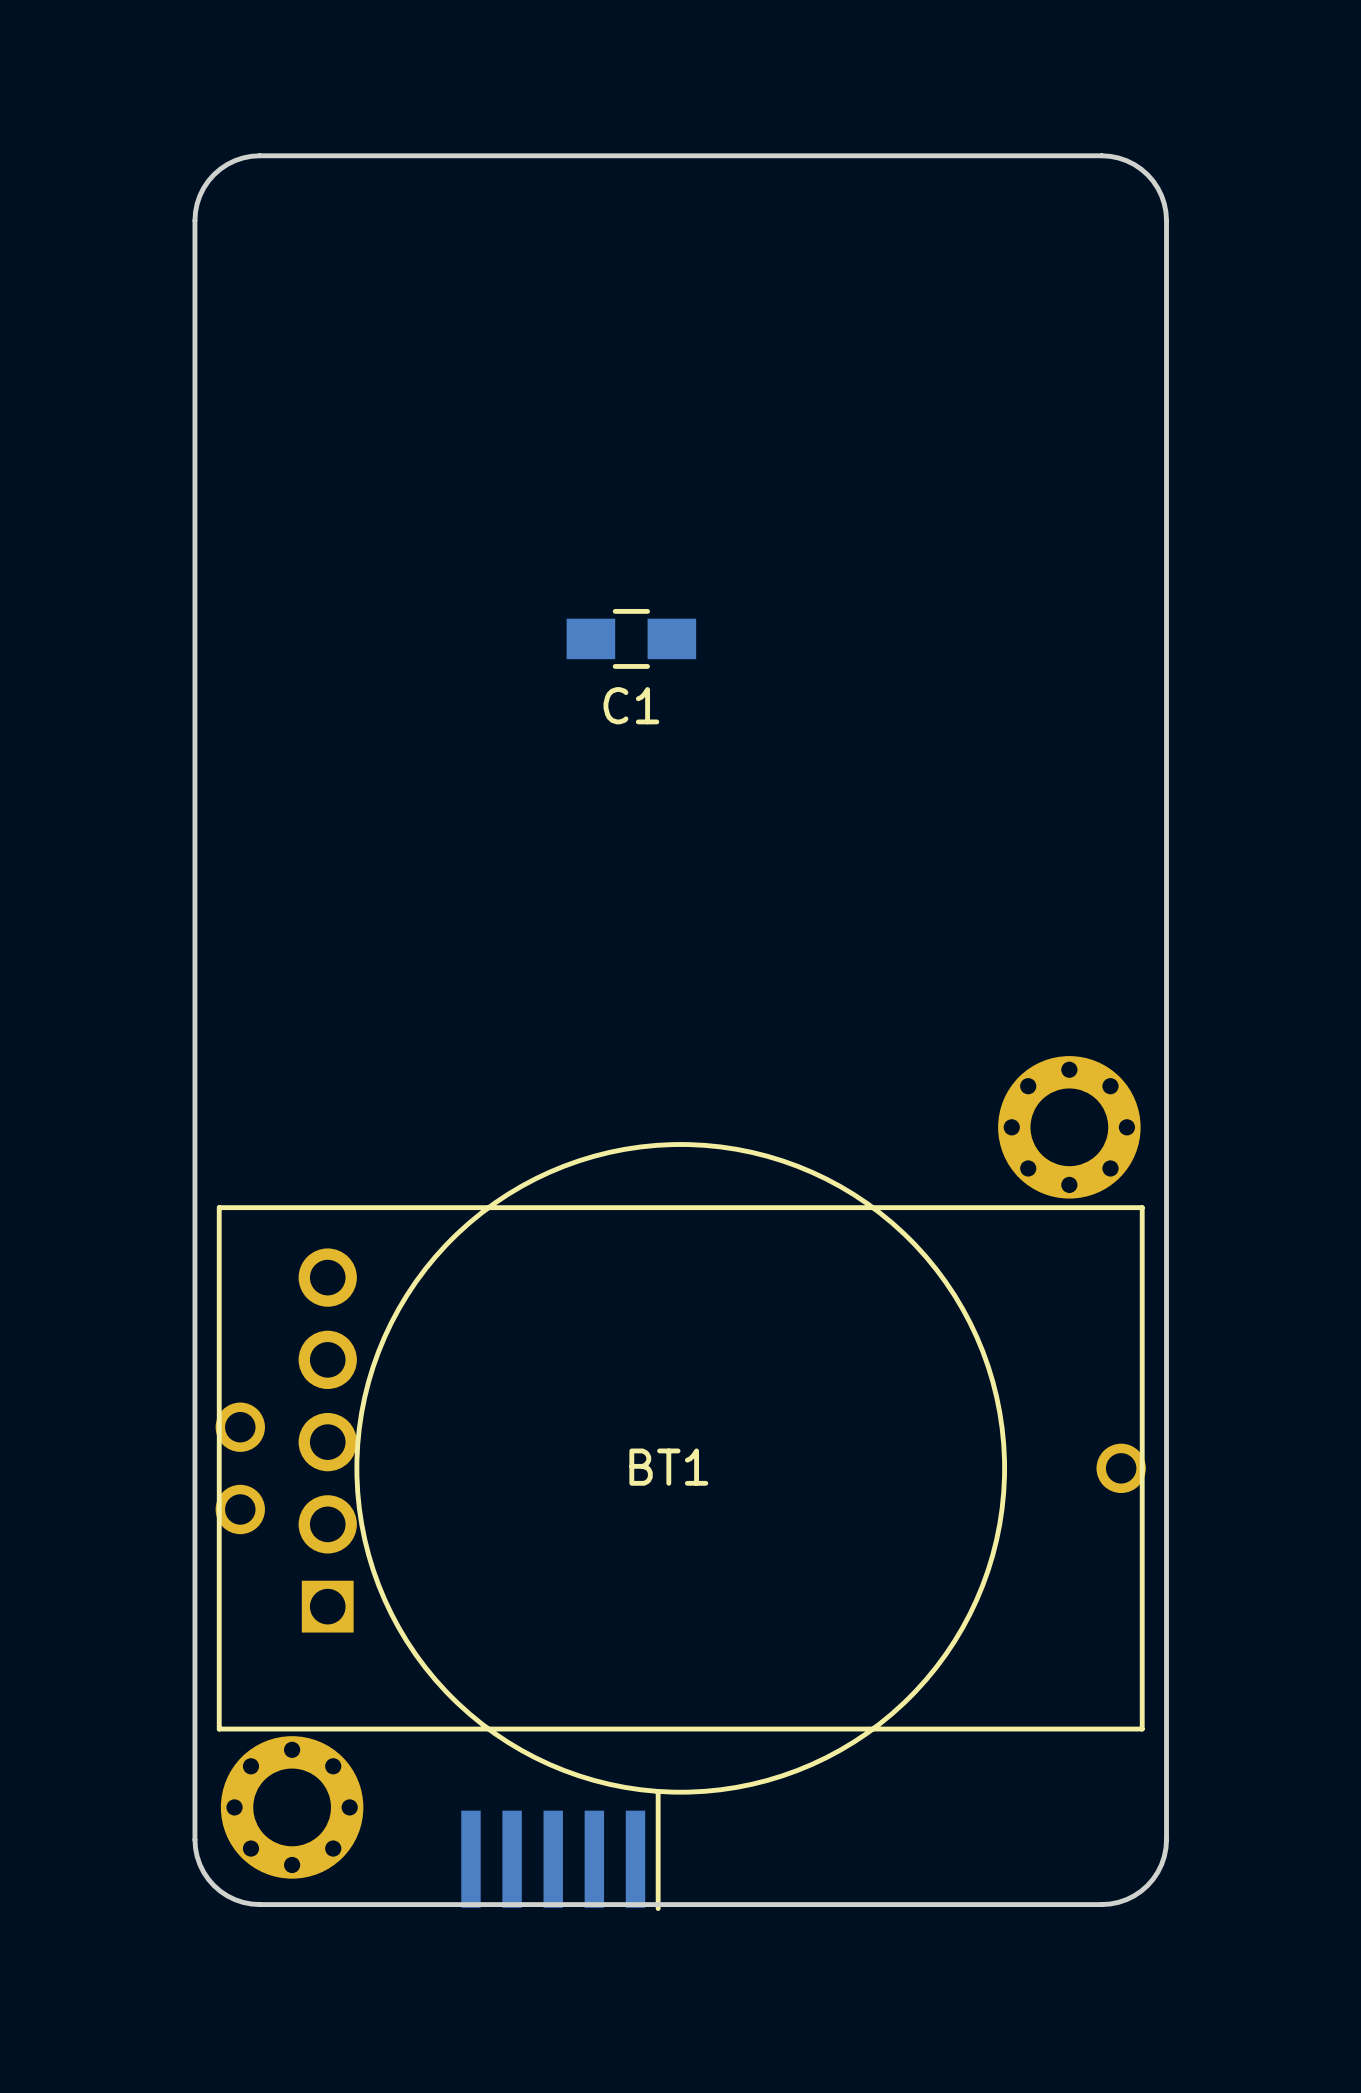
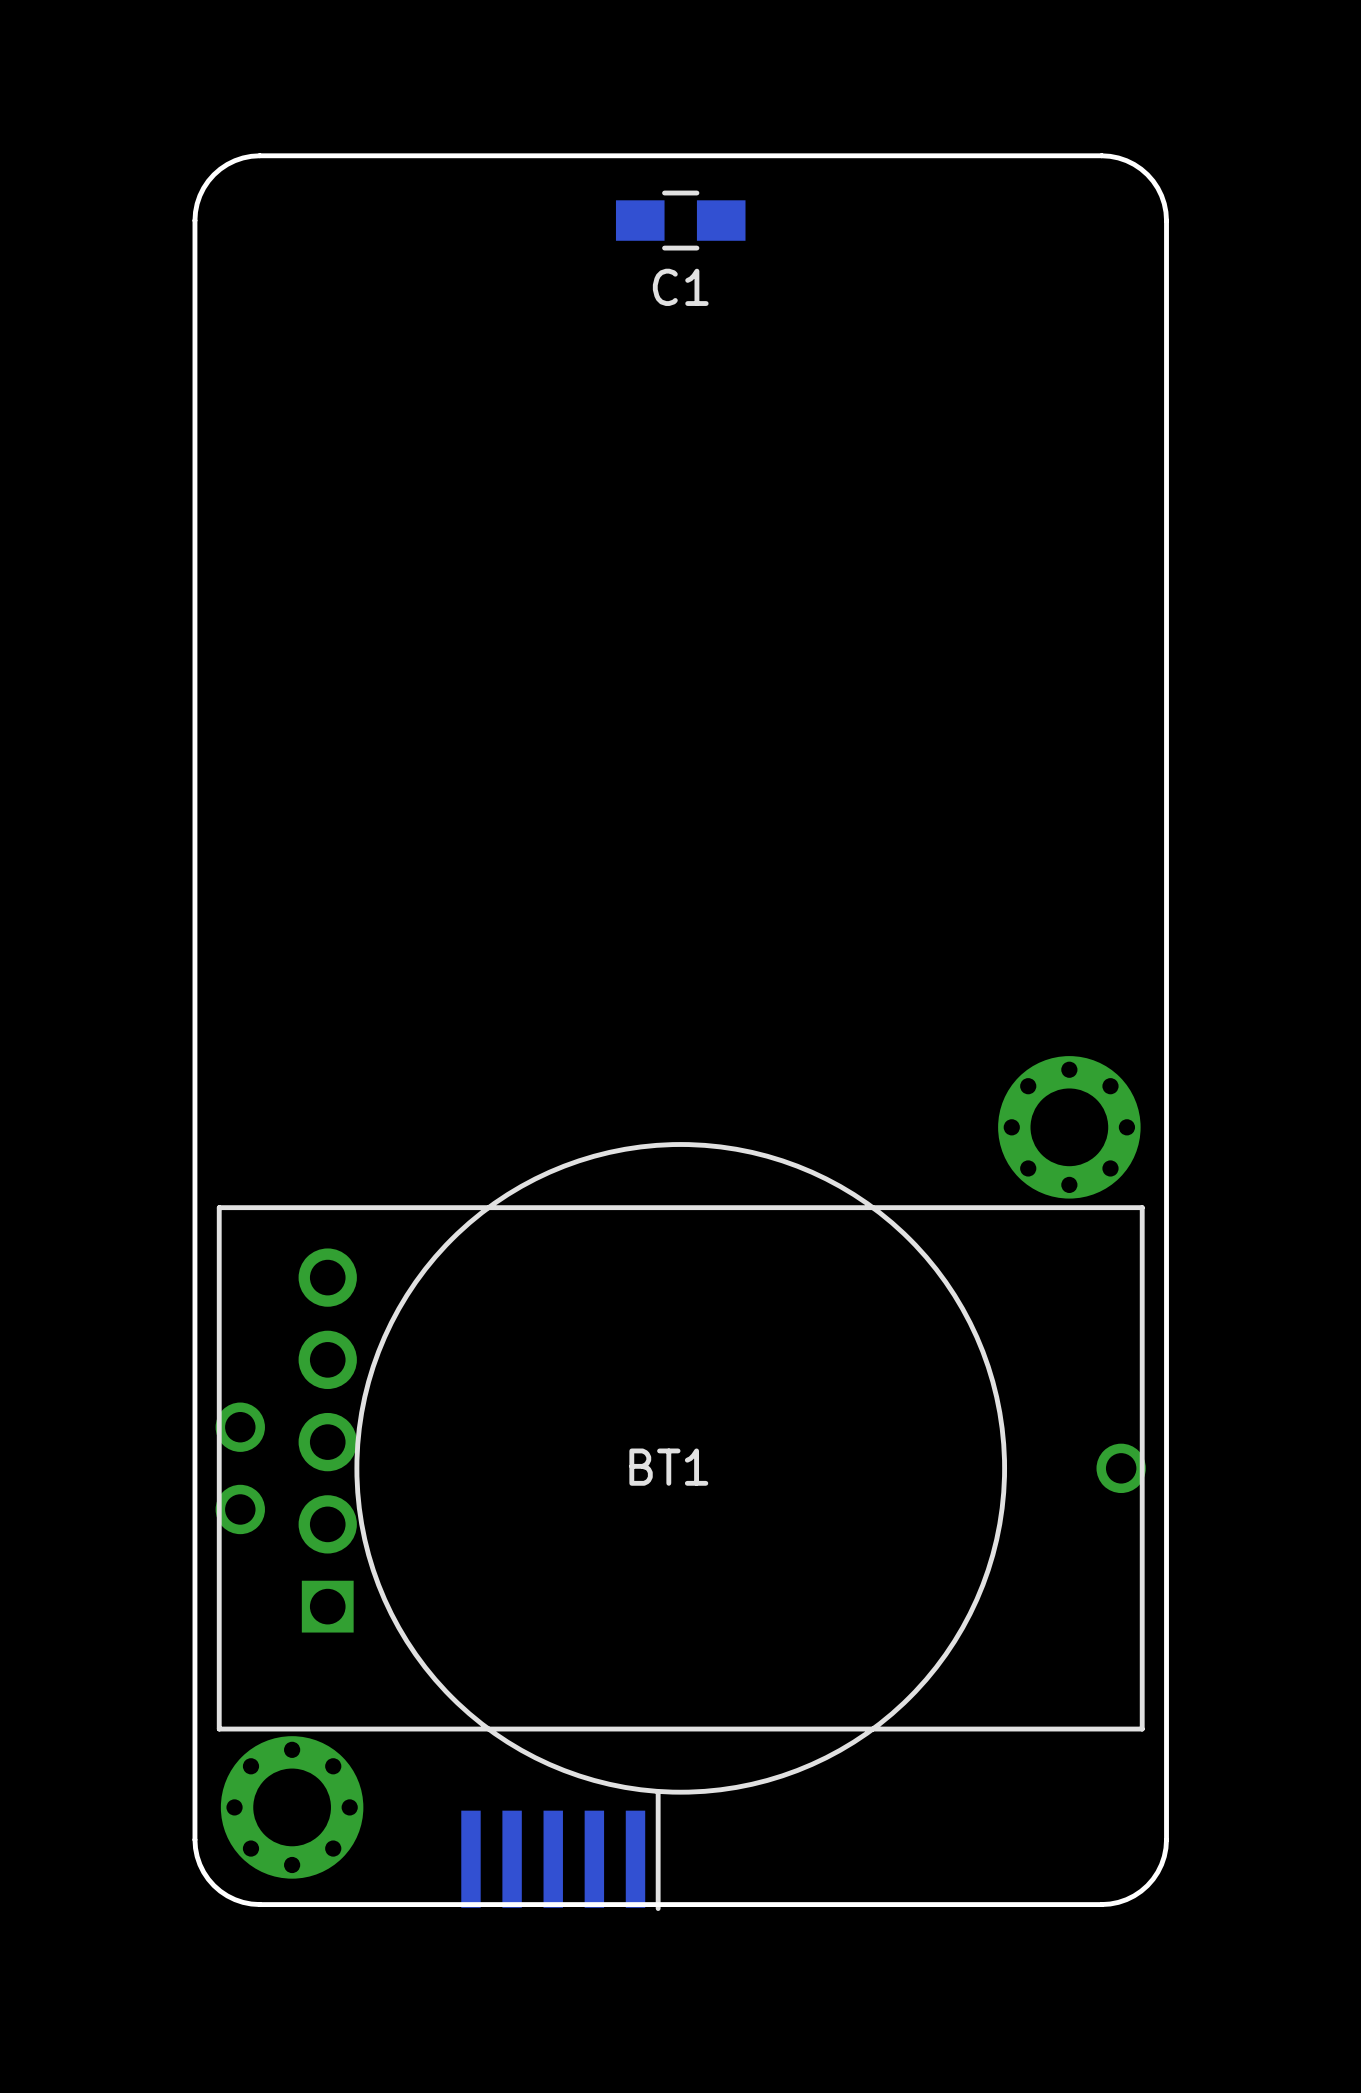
C1 position: (631, 638) -> (680, 220)

